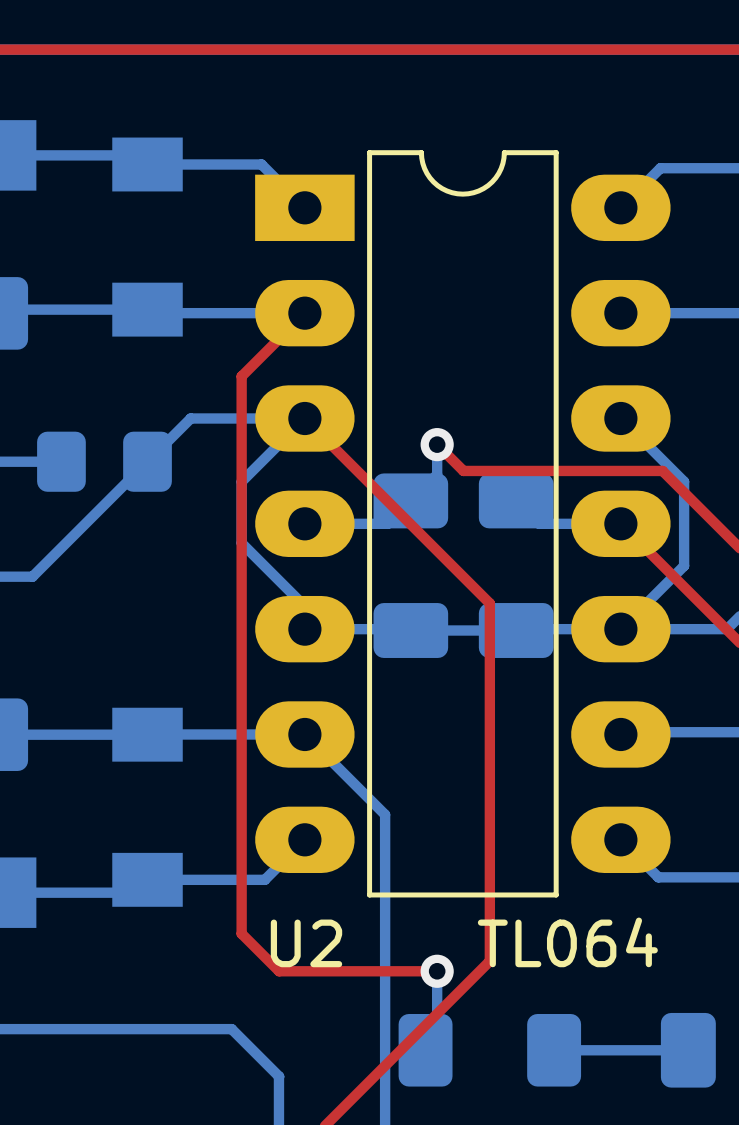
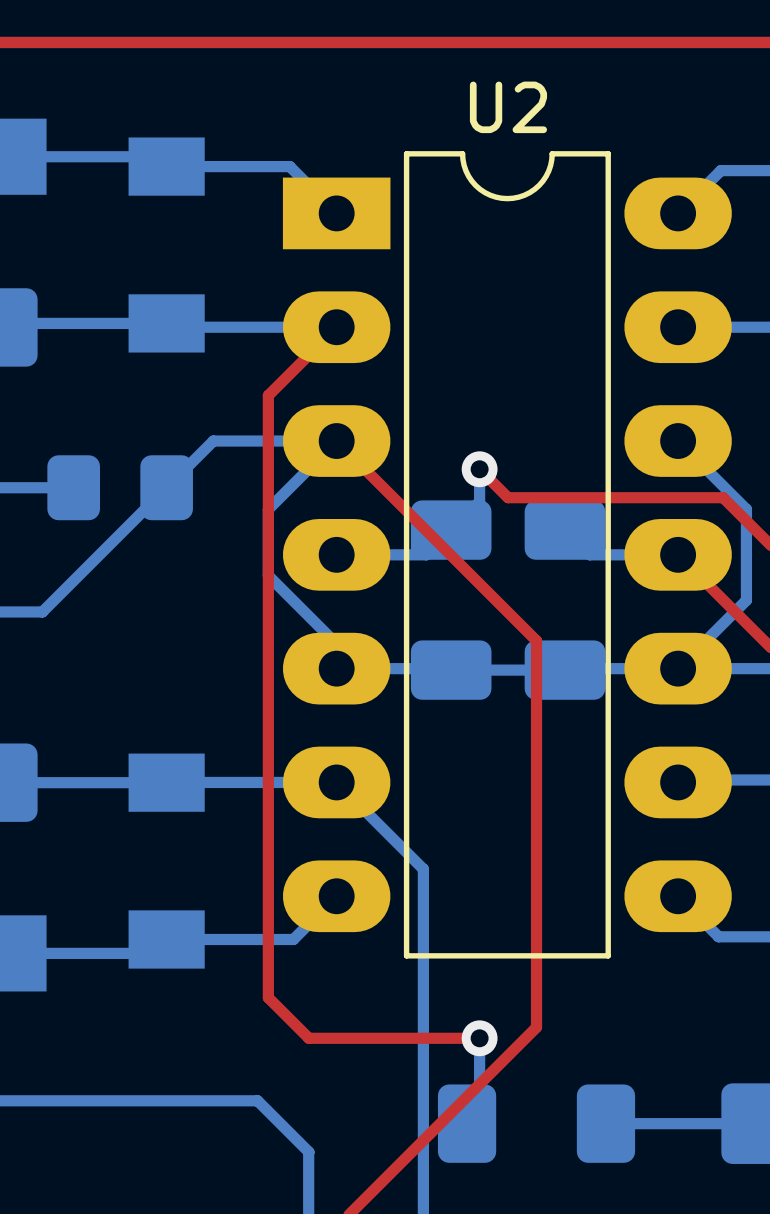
U2 value: TL064 (567, 942) -> none
U2 name position: U2 (306, 943) -> U2 (508, 107)

